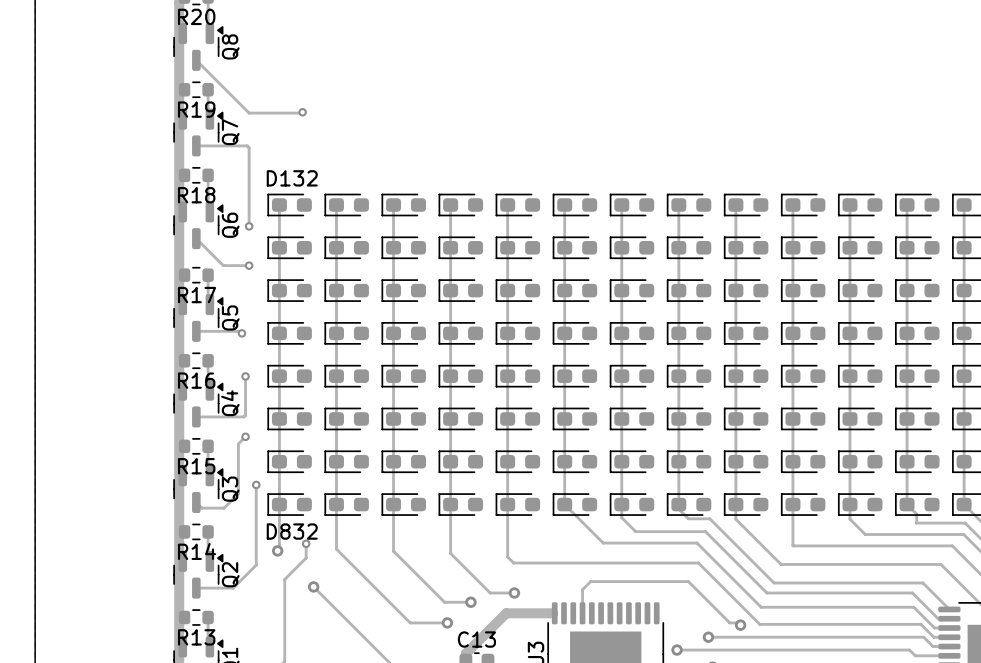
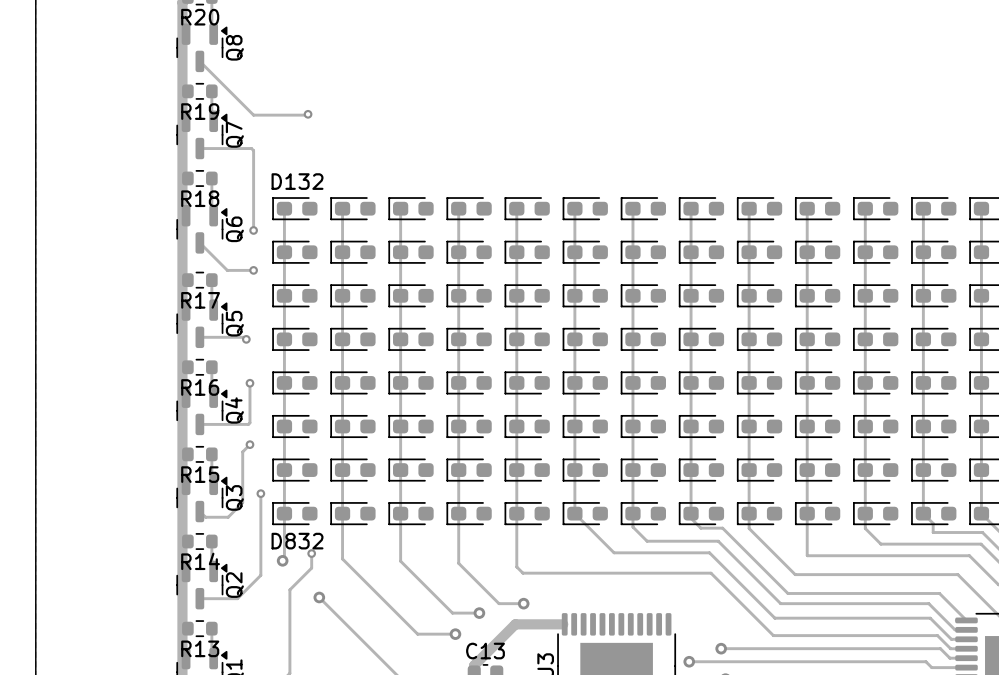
track: (582, 613) (582, 589) (590, 581) (688, 581) (729, 622) (738, 622) (740, 625) -> none
via: (740, 625) -> none

